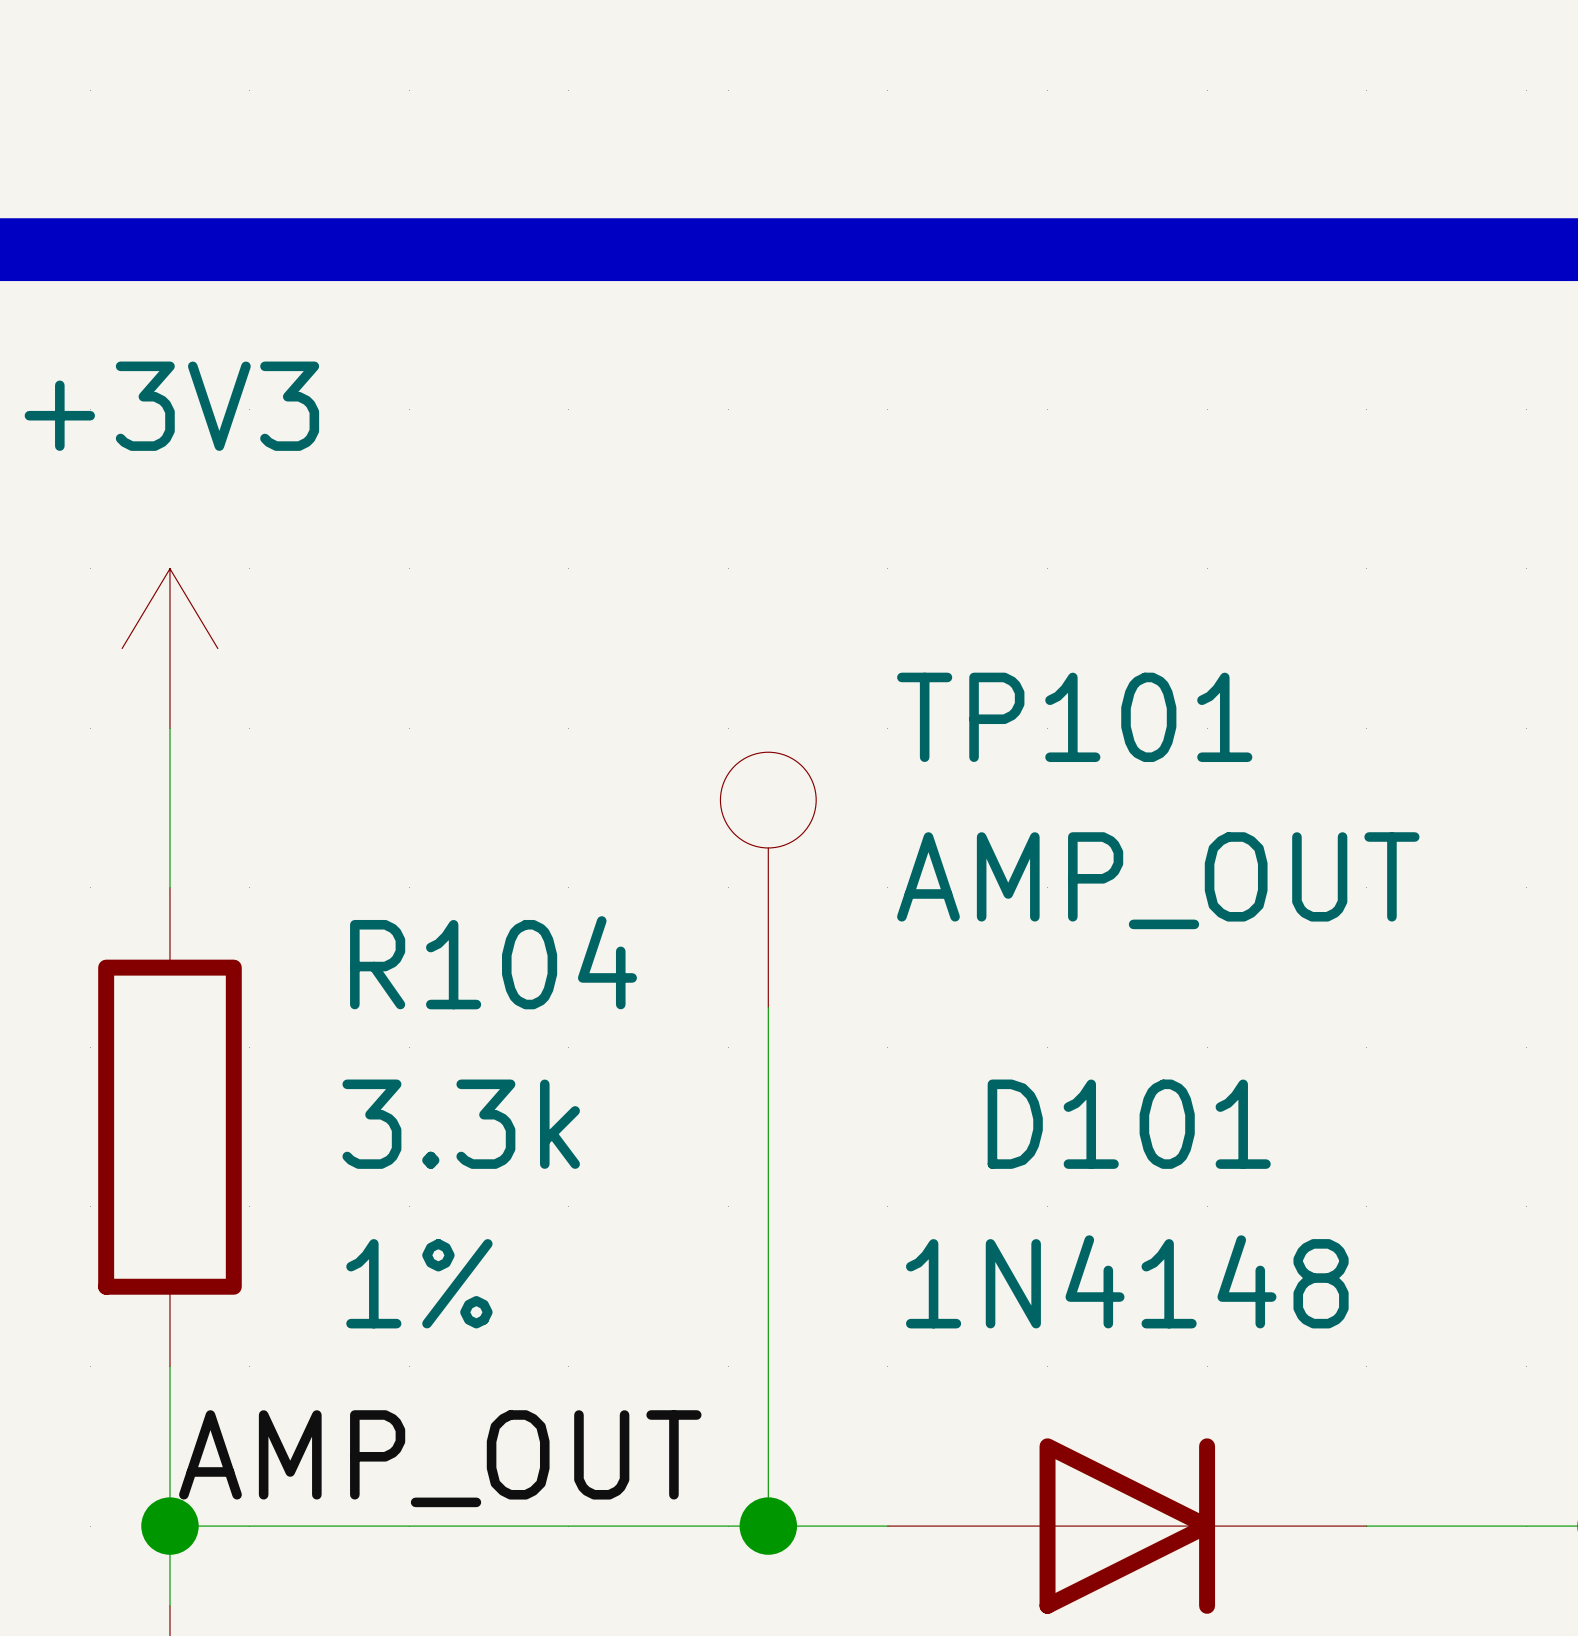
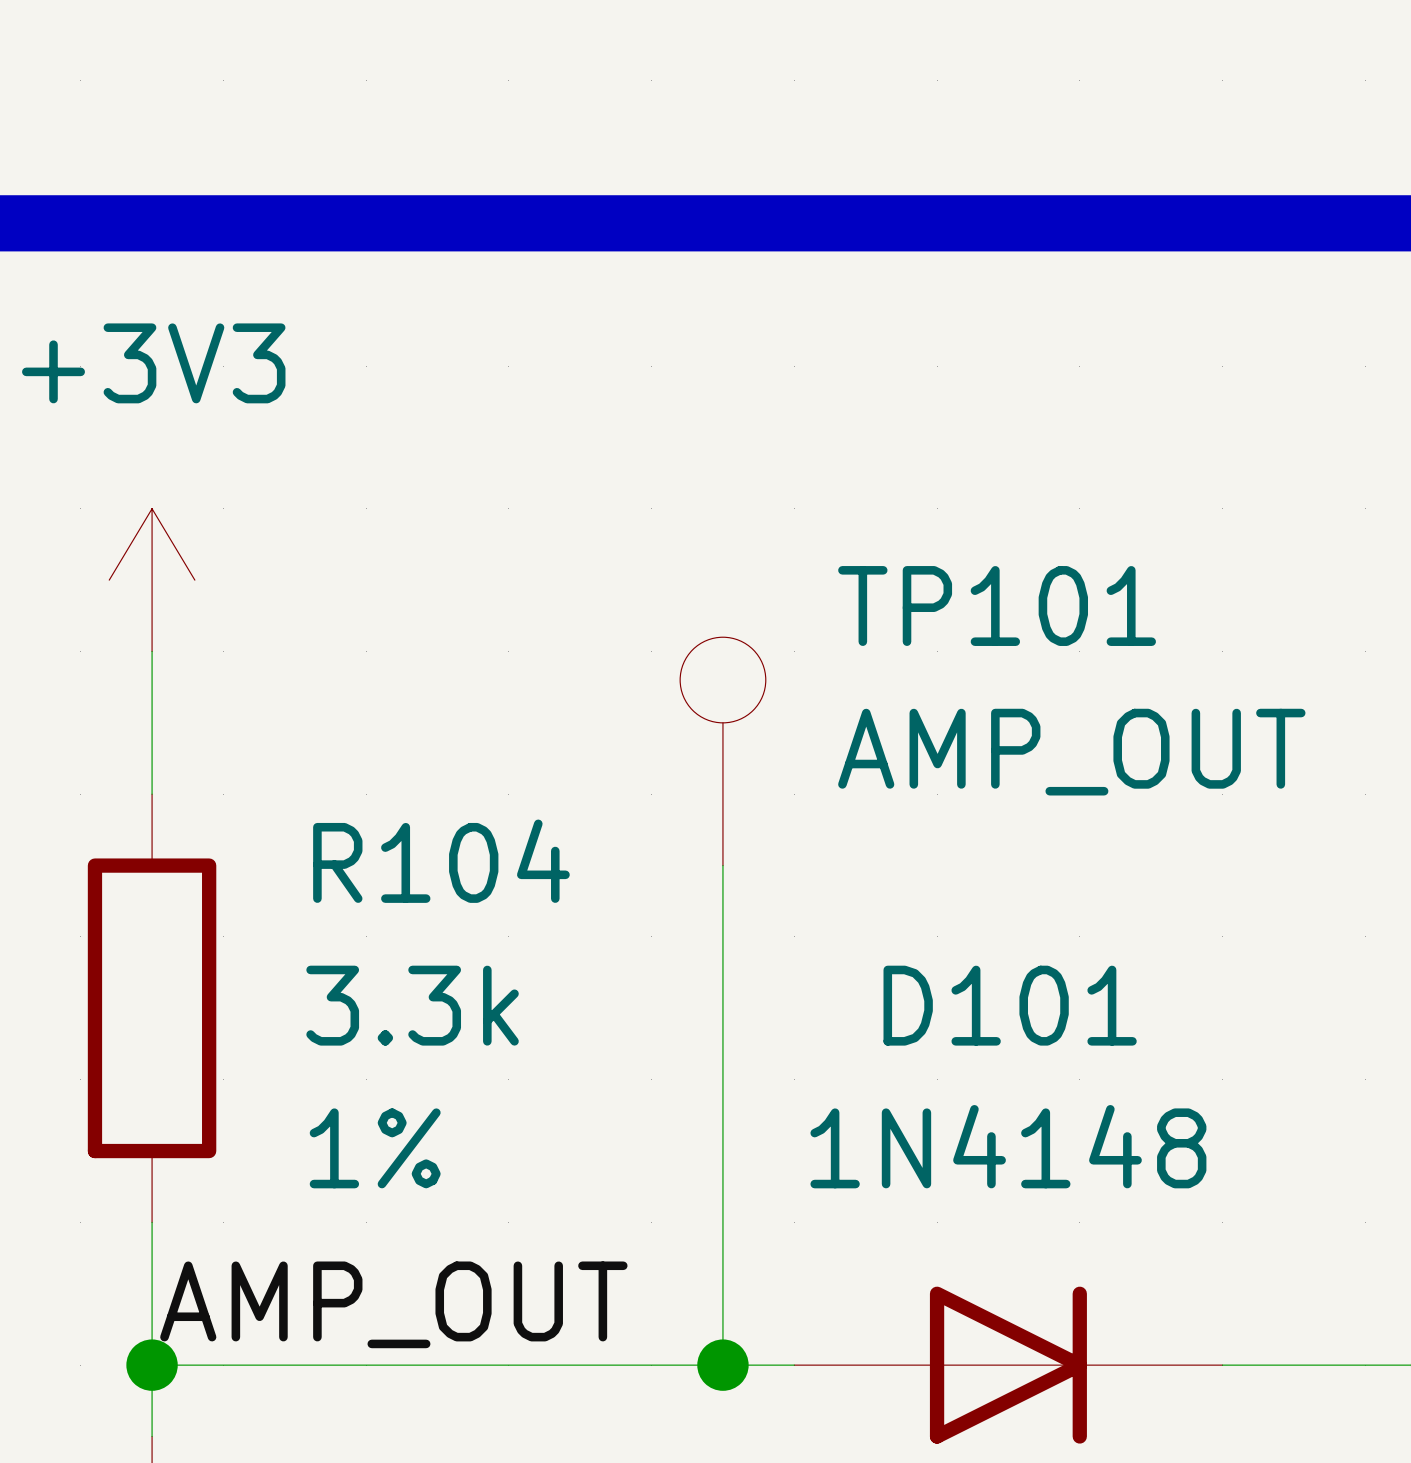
TP101 position: (768, 879) -> (722, 751)
wire: none -> (722, 865) (722, 1365)
wire: (768, 1007) (768, 1526) -> none
junction position: (768, 1526) -> (722, 1365)

